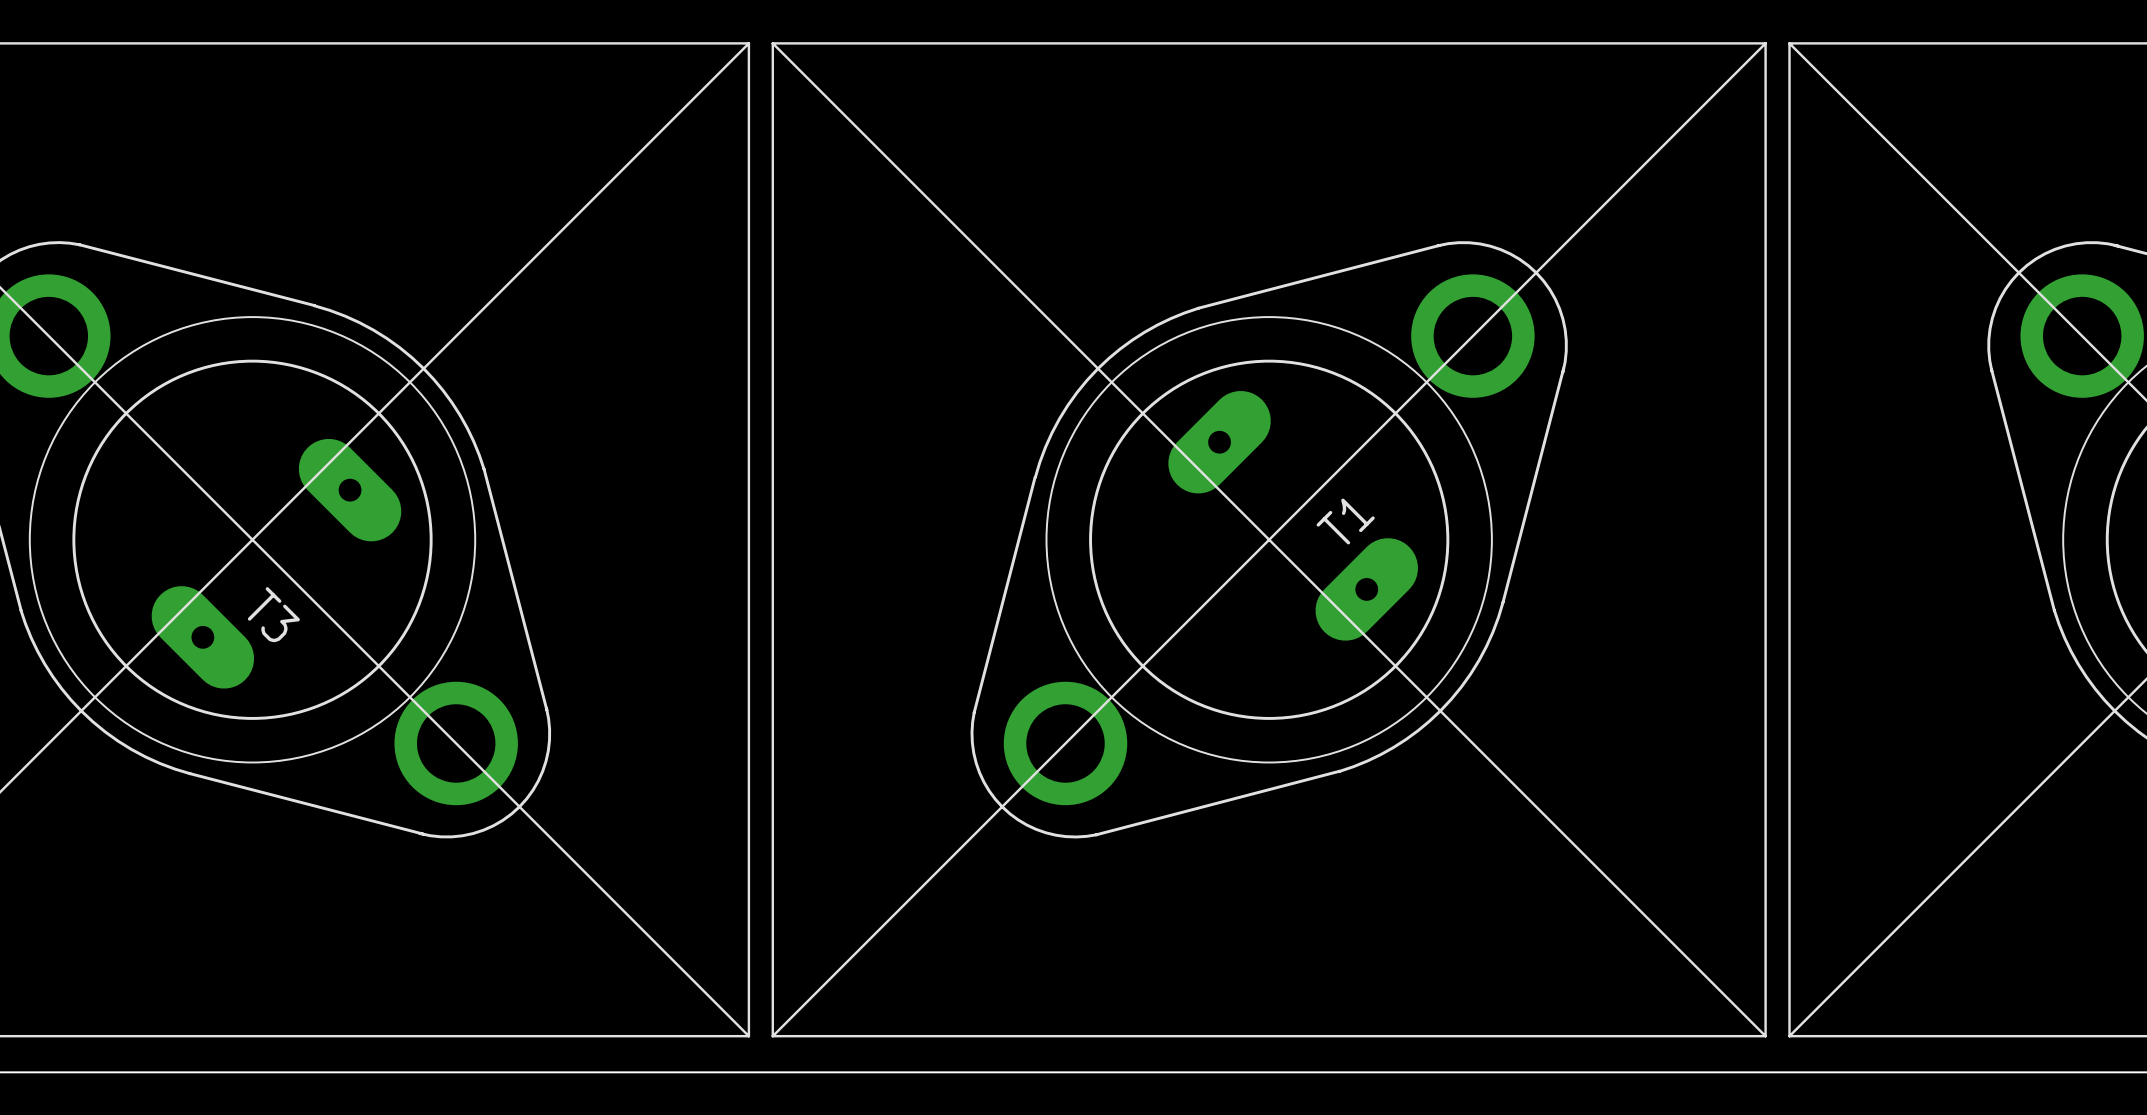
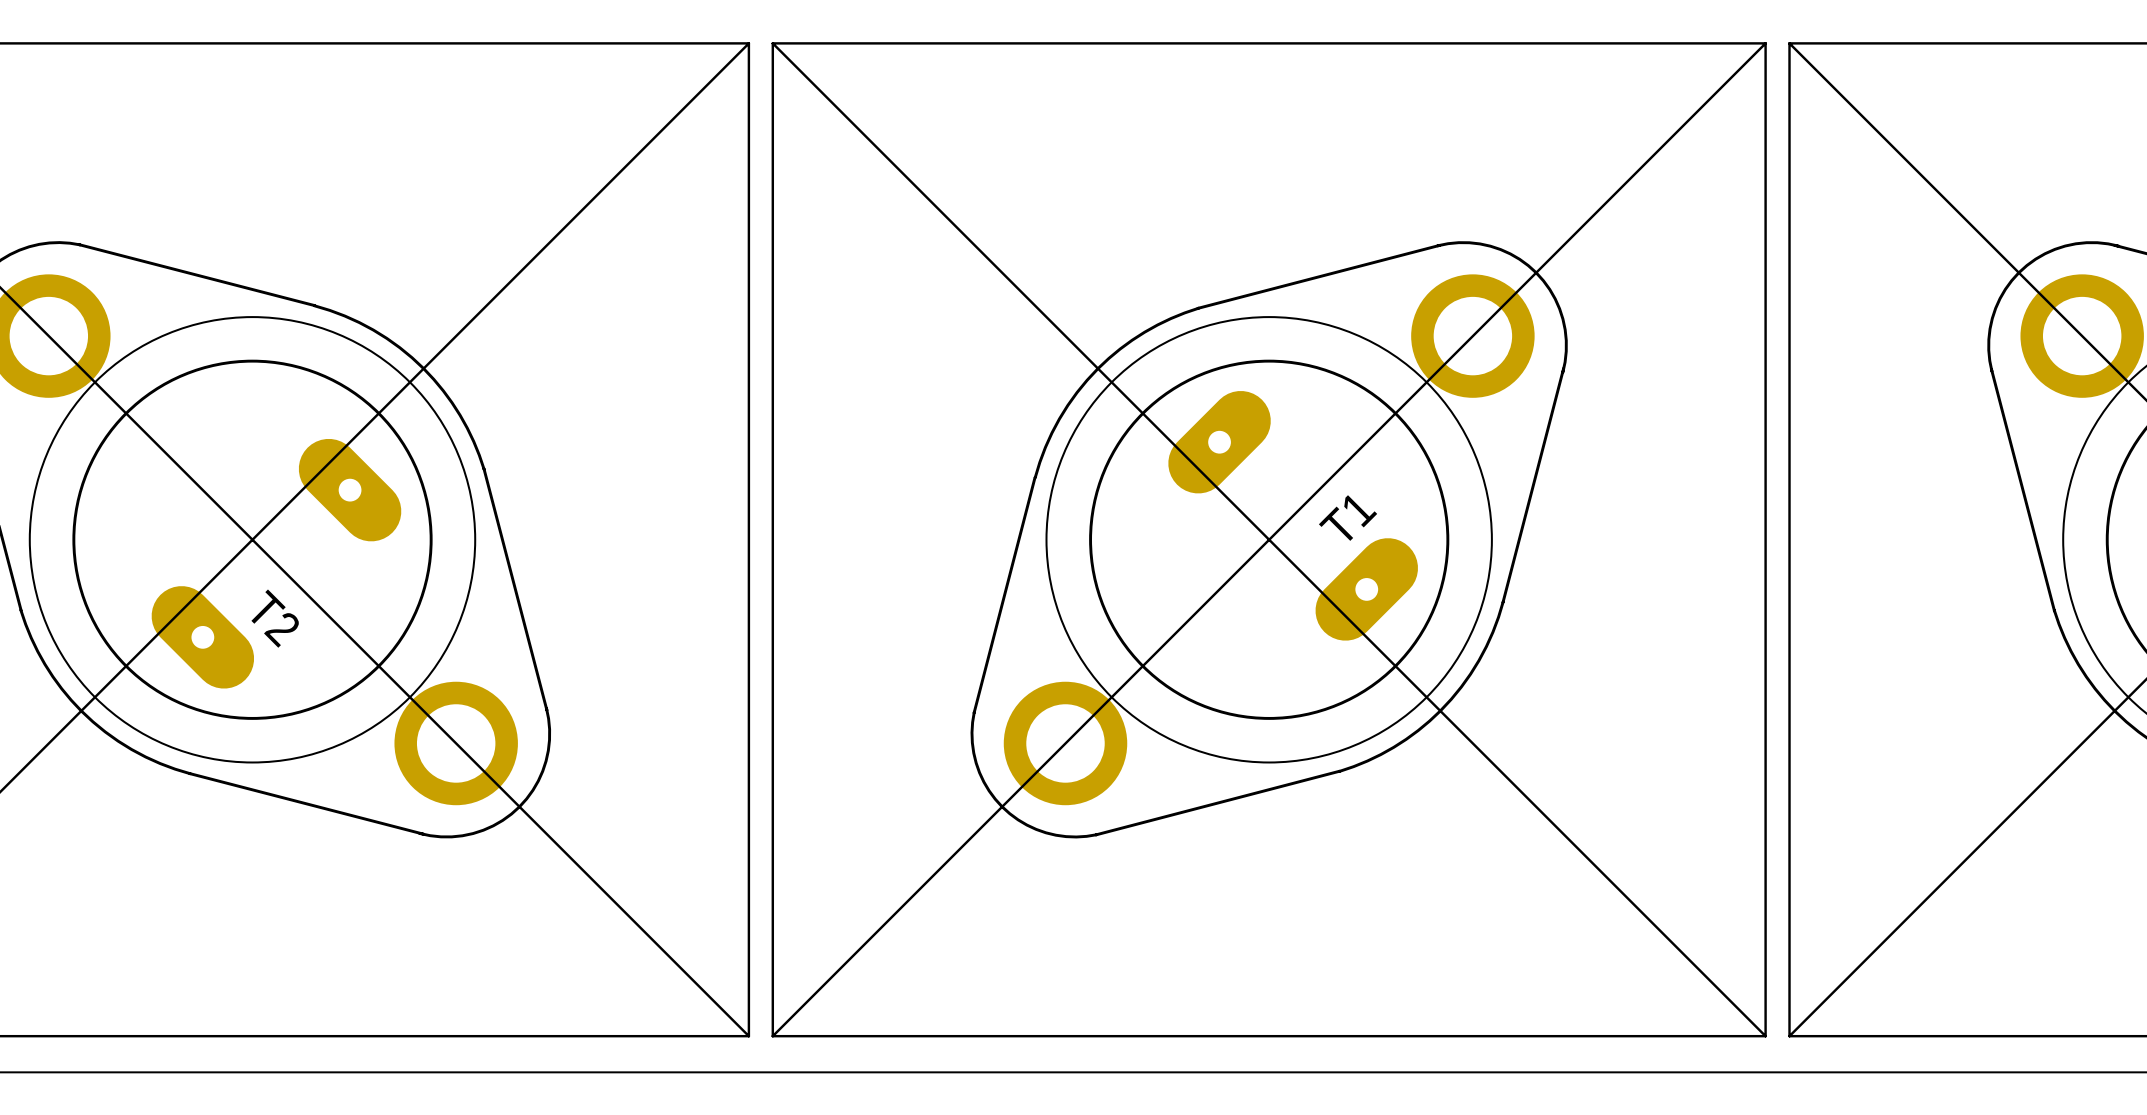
T3 name: T3 (273, 614) -> T2 (275, 618)

